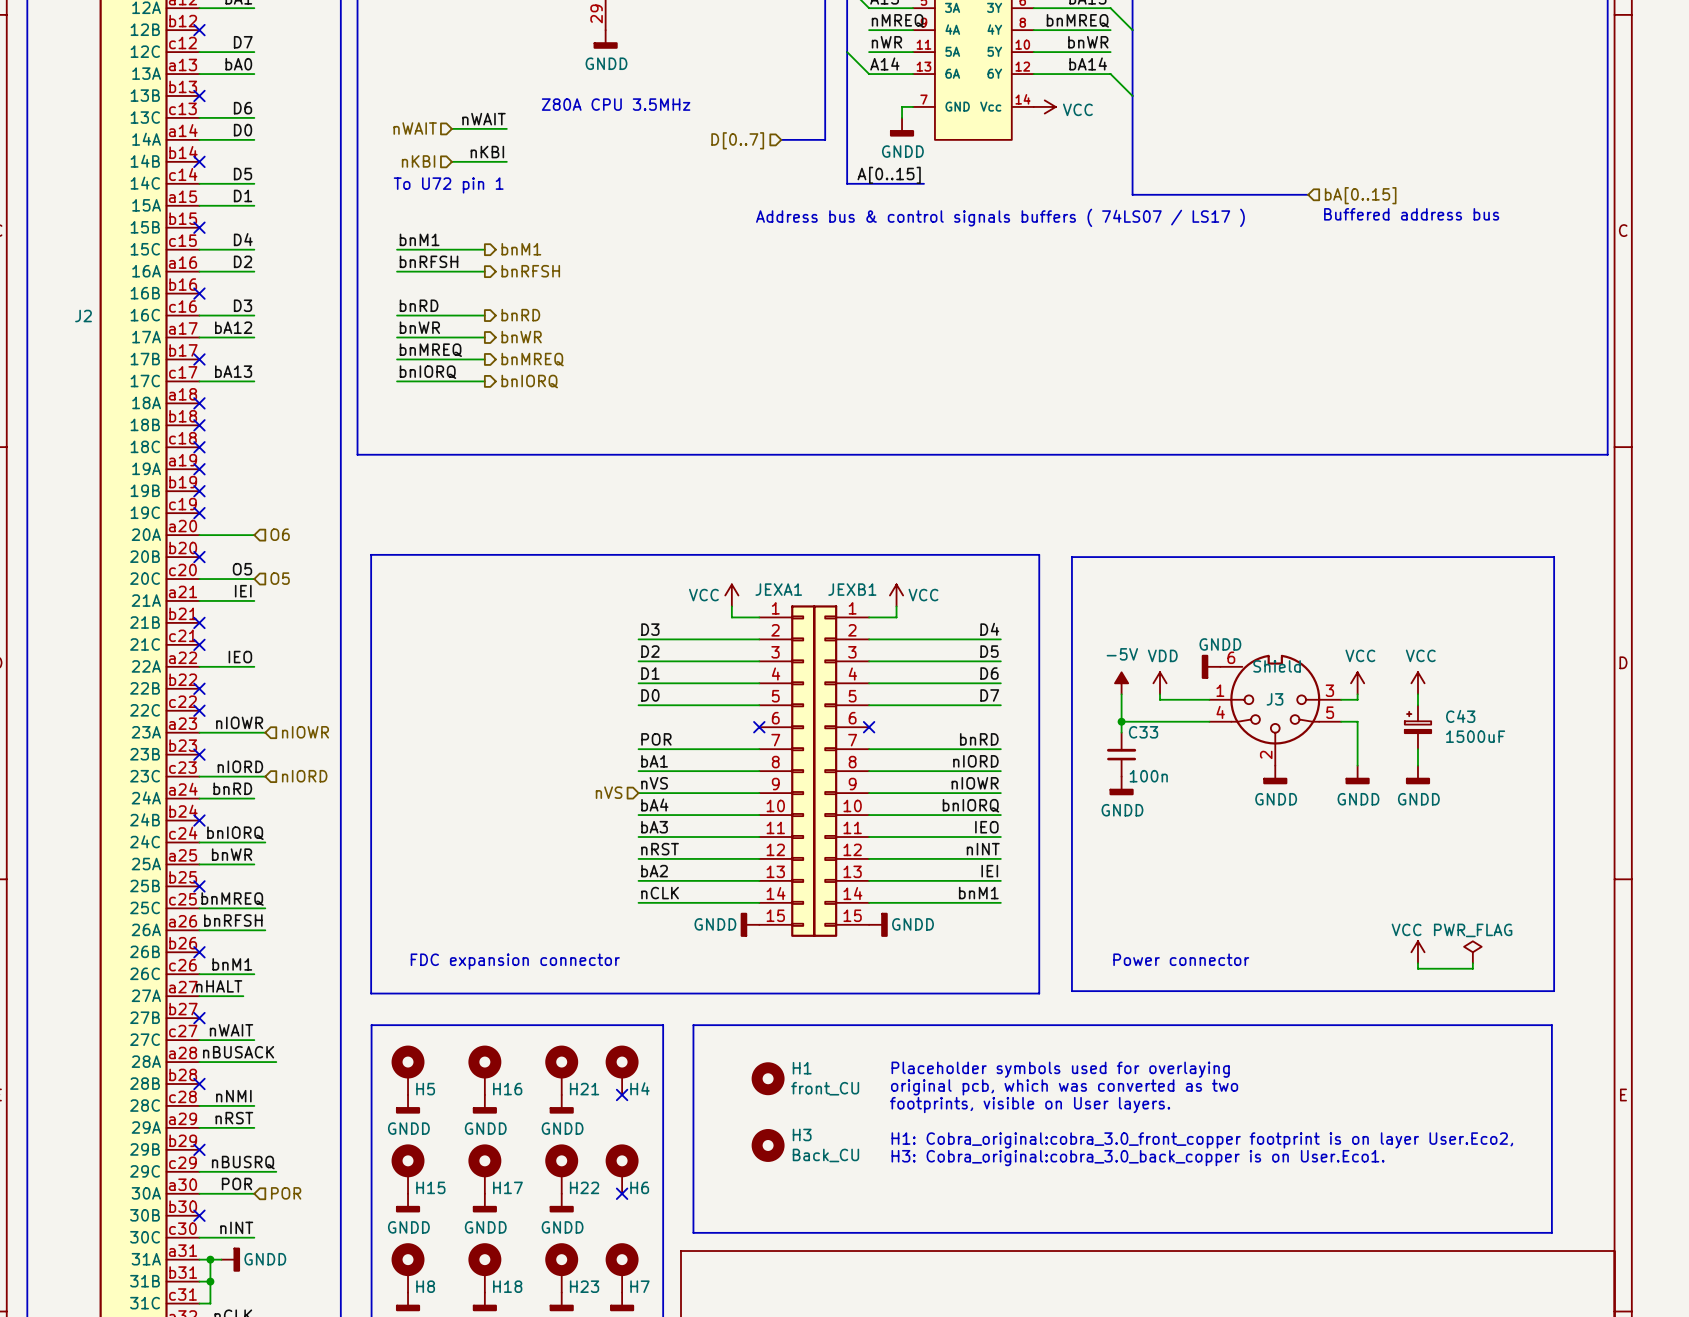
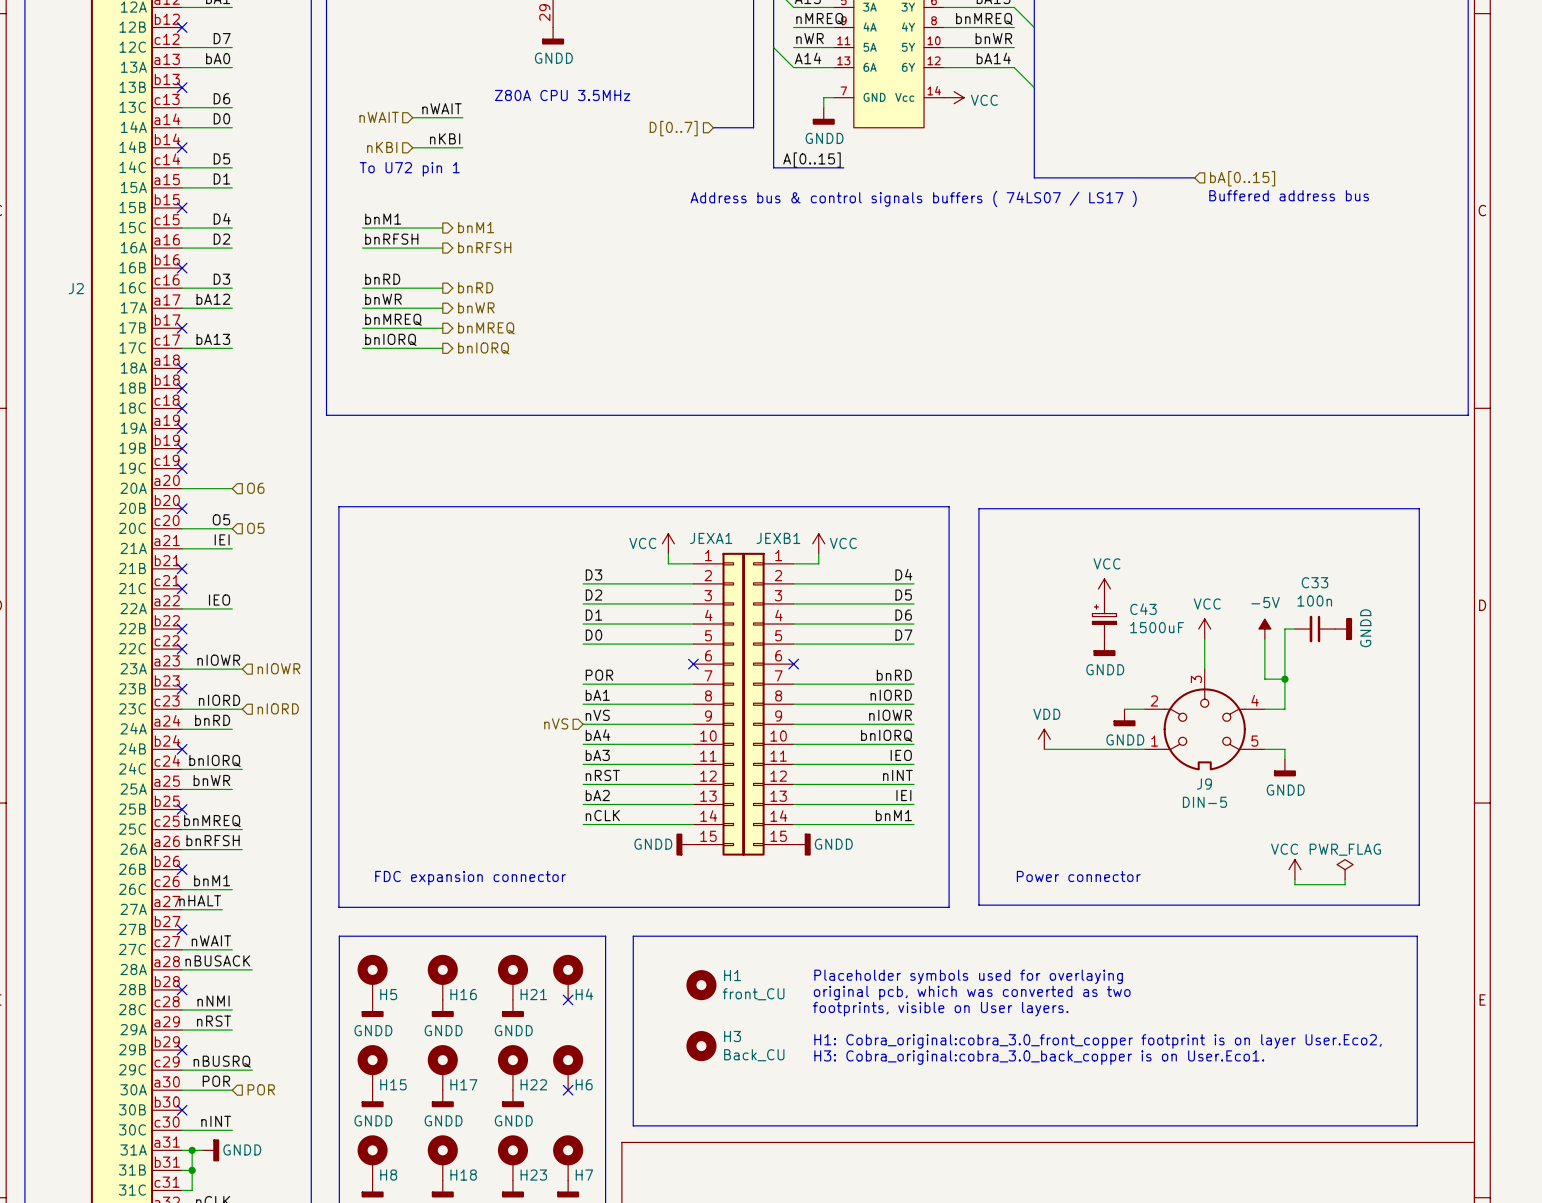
power symbol: none -> VCC (1104, 588)
power symbol text position: GNDD (1220, 644) -> GNDD (1105, 669)
power symbol rotation: 0° (1211, 666) -> 90° counterclockwise (1104, 647)
power symbol position: GNDD (1211, 666) -> GNDD (1104, 647)
power symbol: -5V (1121, 683) -> none
power symbol position: VDD (1160, 683) -> VDD (1044, 739)
power symbol position: VCC (1357, 683) -> VCC (1204, 629)
power symbol: VCC (1417, 683) -> none
power symbol: none -> -5V (1264, 629)
wire: none -> (1294, 629) (1284, 629) (1284, 709) (1264, 709)
power symbol: none -> GNDD (1343, 629)
wire: (1121, 694) (1121, 732) -> none
wire: (1160, 694) (1160, 699) (1209, 699) -> none
wire: (1357, 694) (1357, 699) (1341, 699) -> none
wire: (1417, 694) (1417, 705) -> none
wire: none -> (1204, 639) (1204, 669)
wire: none -> (1264, 639) (1264, 679) (1284, 679)
J3: (1275, 710) -> none
wire: (1121, 721) (1209, 721) -> none
junction: (1121, 721) -> none
wire: (1341, 721) (1357, 721) (1357, 765) -> none
C43 position: (1417, 727) -> (1104, 619)
C33 name position: C33 (1143, 732) -> C33 (1315, 582)
junction: none -> (1284, 679)
wire: (1417, 749) (1417, 765) -> none
C33 rotation: 0° (1121, 754) -> 90° counterclockwise (1314, 629)
C33 position: (1121, 754) -> (1315, 629)
power symbol position: GNDD (1275, 774) -> GNDD (1124, 717)
power symbol: GNDD (1357, 774) -> none
power symbol: GNDD (1417, 774) -> none
C33 value position: 100n (1148, 776) -> 100n (1314, 600)
wire: none -> (1124, 709) (1144, 709)
power symbol: GNDD (1121, 785) -> none
J9: none -> DIN-5 (1204, 719)
wire: none -> (1044, 749) (1144, 749)
wire: none -> (1264, 749) (1284, 749) (1284, 759)
power symbol: none -> GNDD (1284, 767)

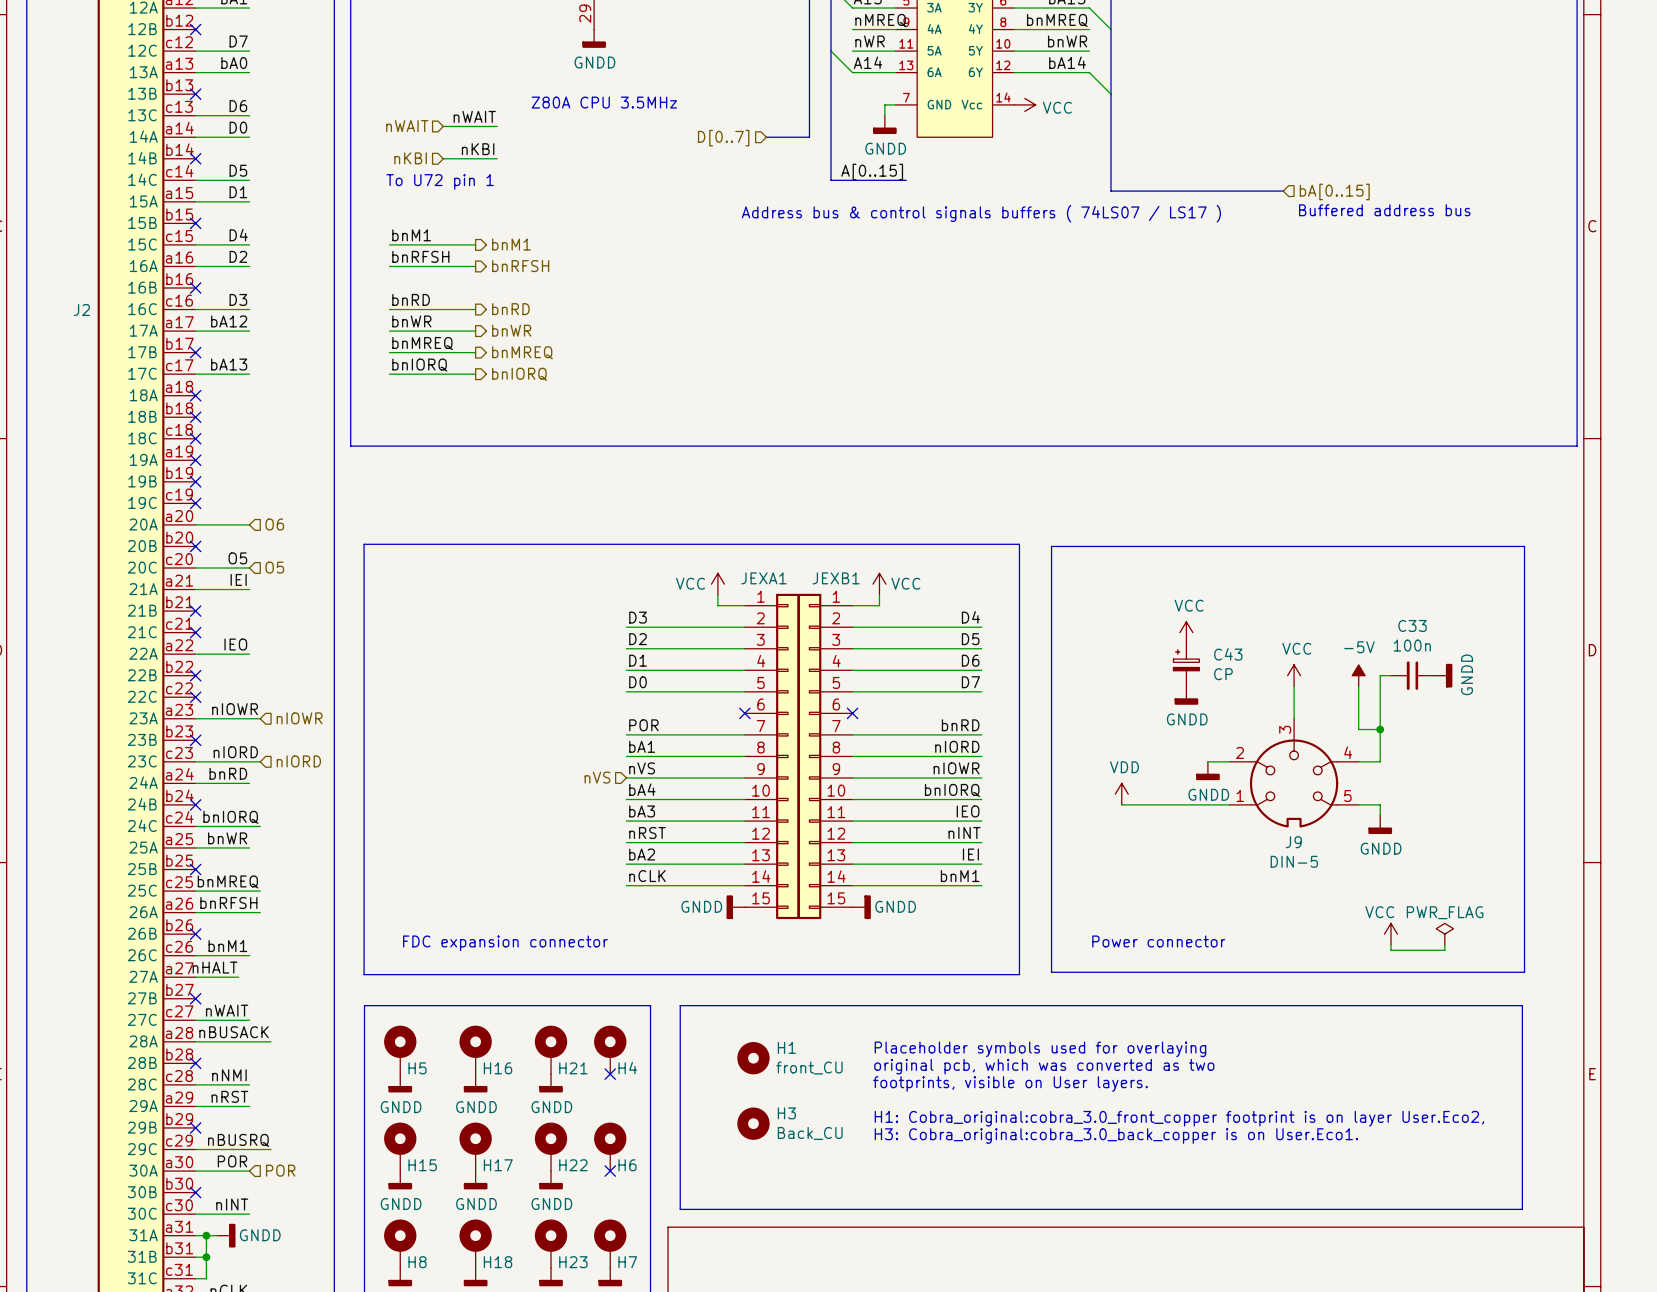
C43 value: 1500uF (1157, 627) -> CP (1223, 674)

